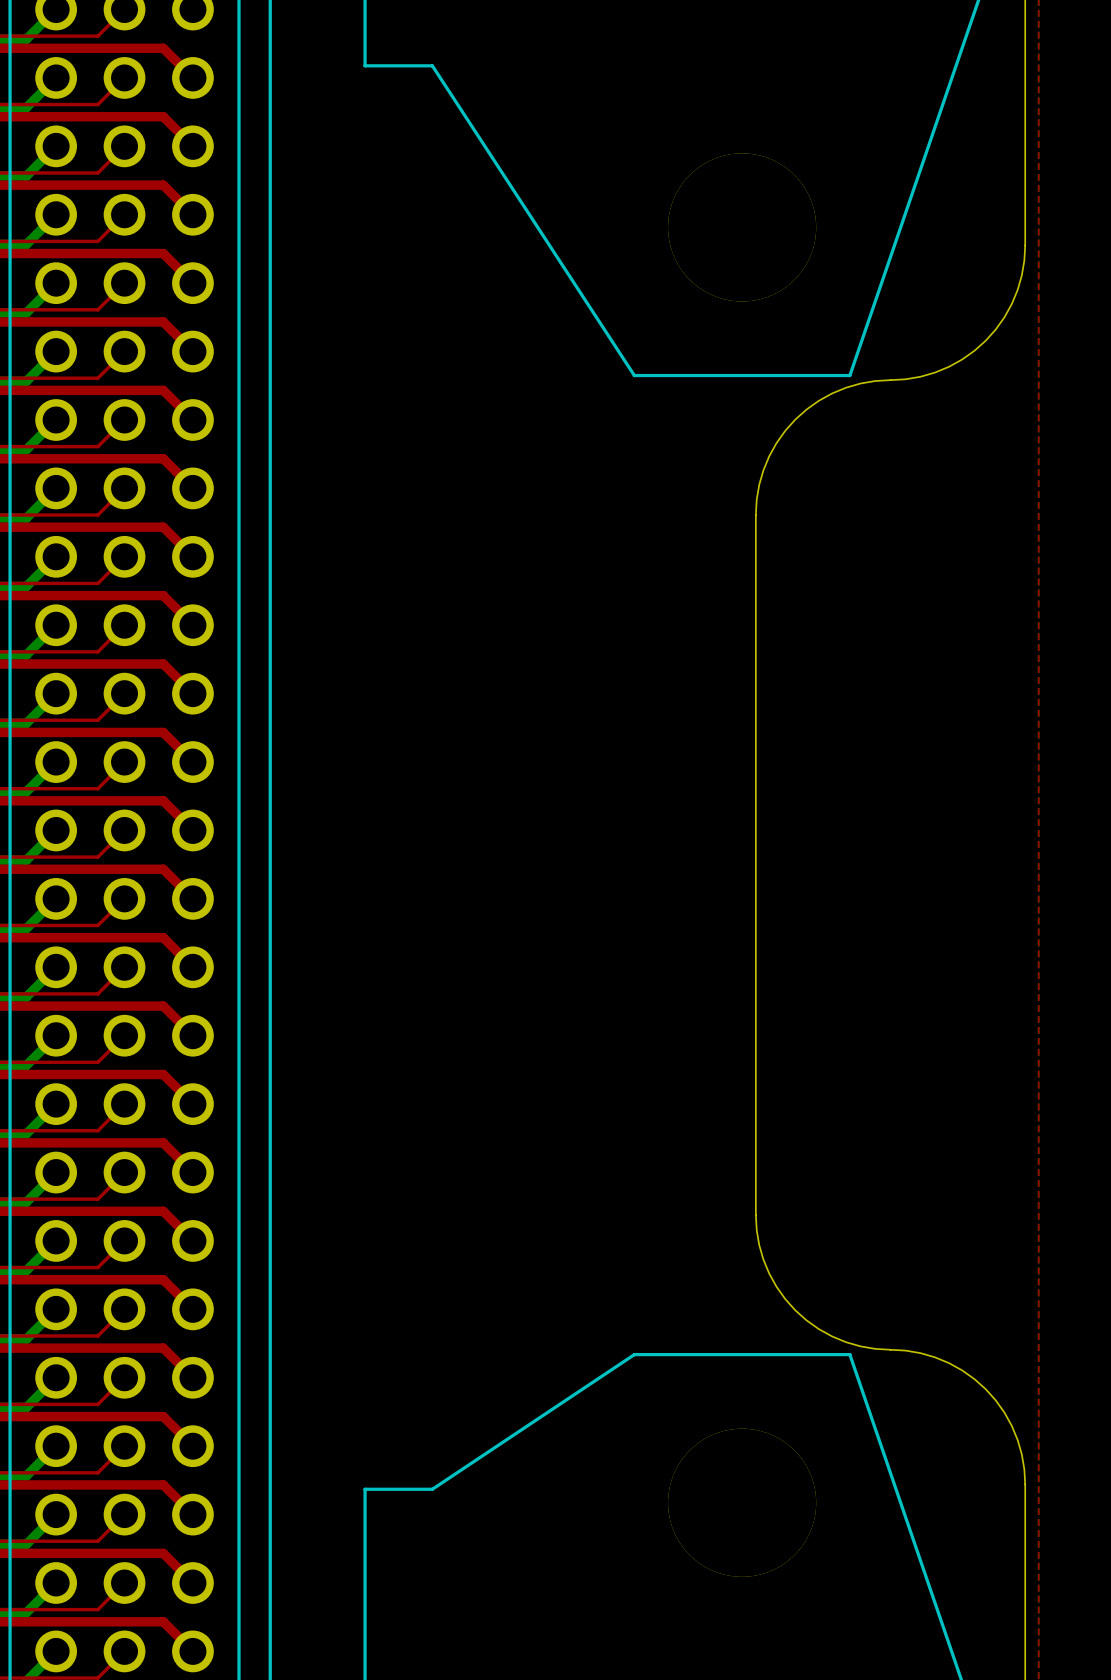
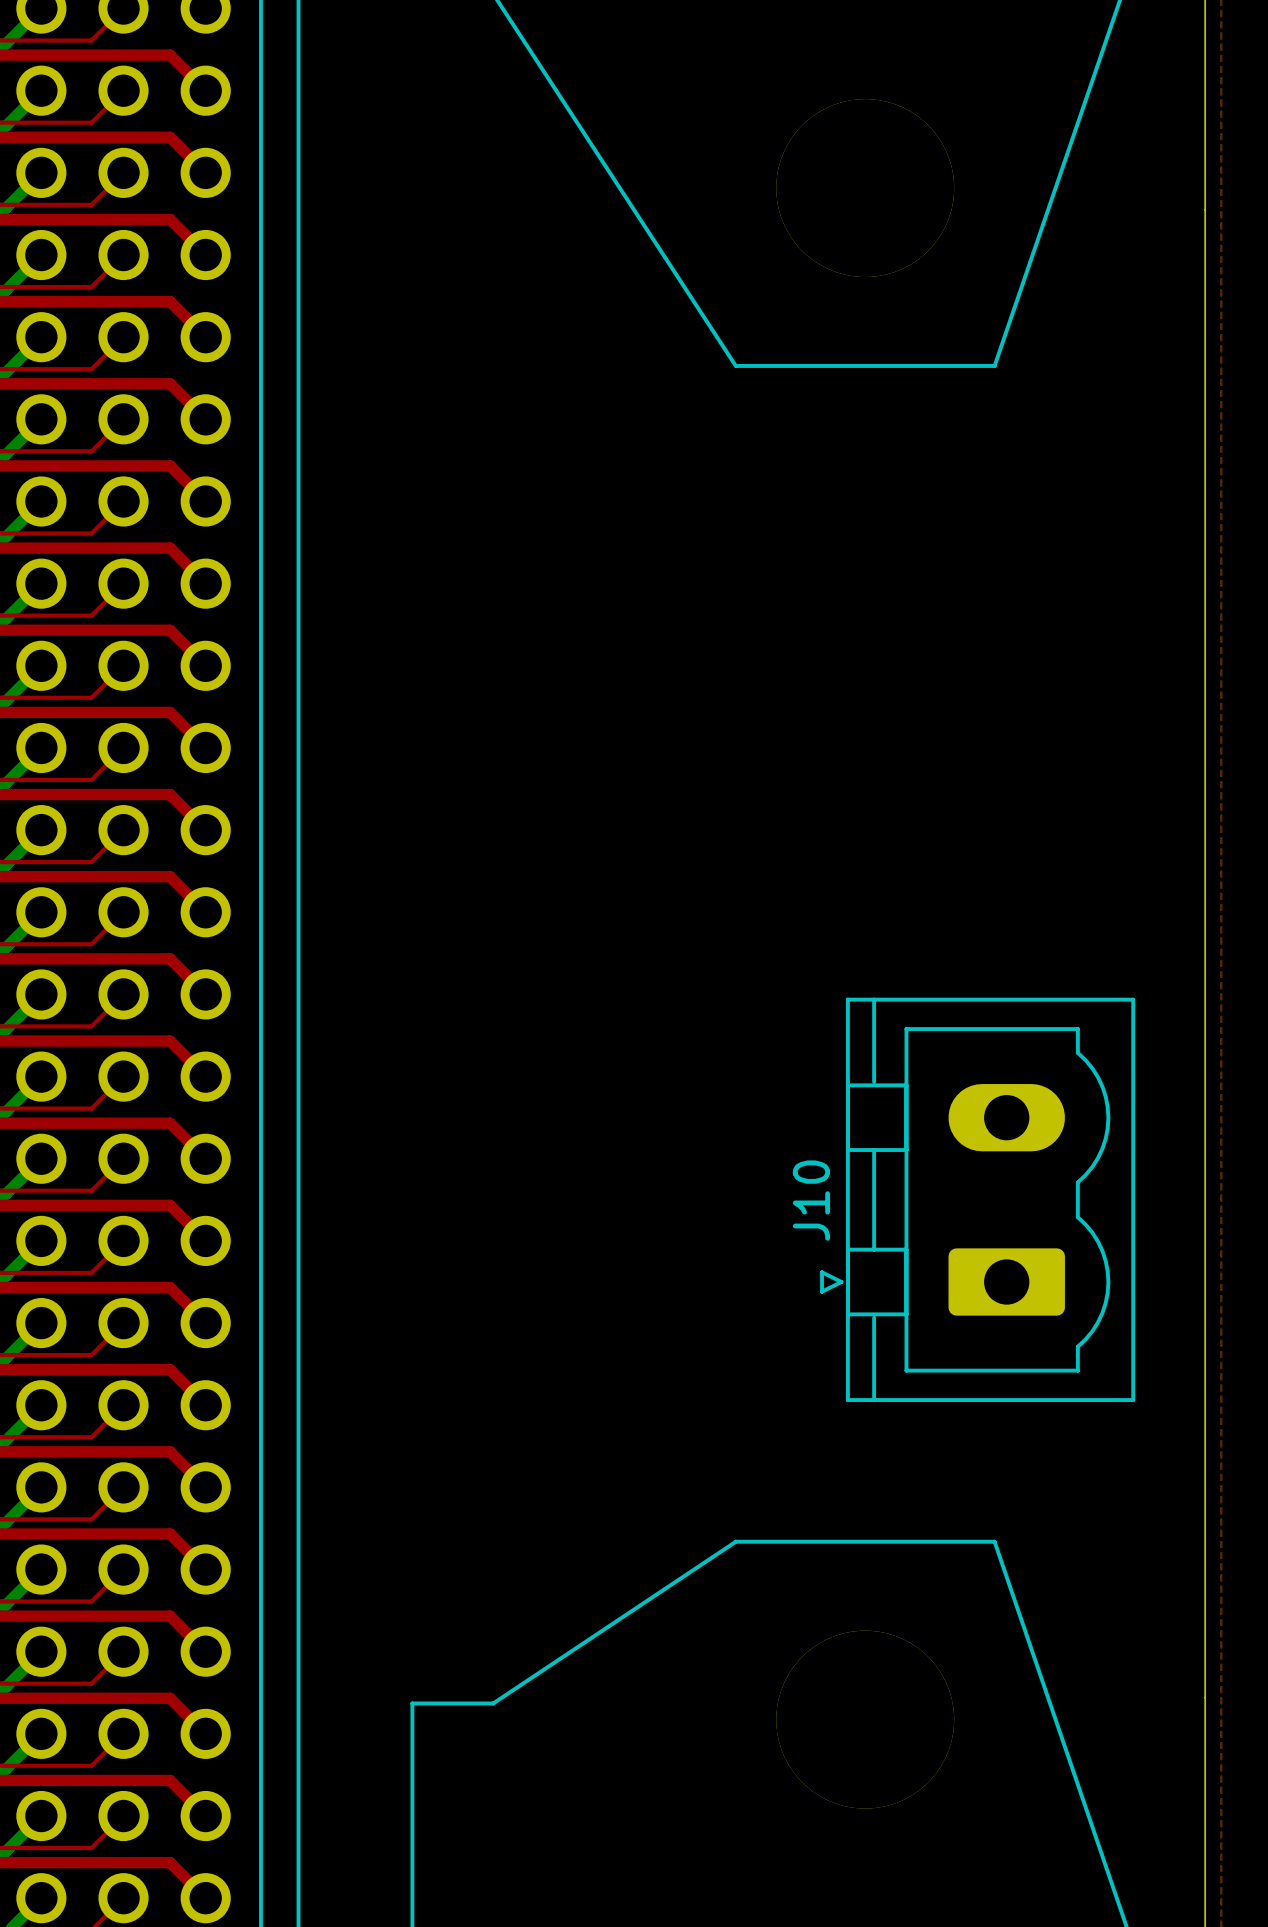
board edge: (1025, 245) (1024, 260) (1017, 289) (1004, 317) (985, 340) (962, 359) (935, 372) (905, 379) (860, 383) (832, 393) (806, 409) (785, 430) (769, 456) (759, 484) (755, 514) (755, 1215) (759, 1245) (763, 1259) (776, 1286) (795, 1310) (818, 1329) (846, 1342) (860, 1346) (905, 1350) (935, 1357) (962, 1370) (985, 1389) (1004, 1412) (1017, 1439) (1024, 1469) (1025, 1484) -> (1205, 209) (1205, 1697)
J10: none -> (977, 1199)

